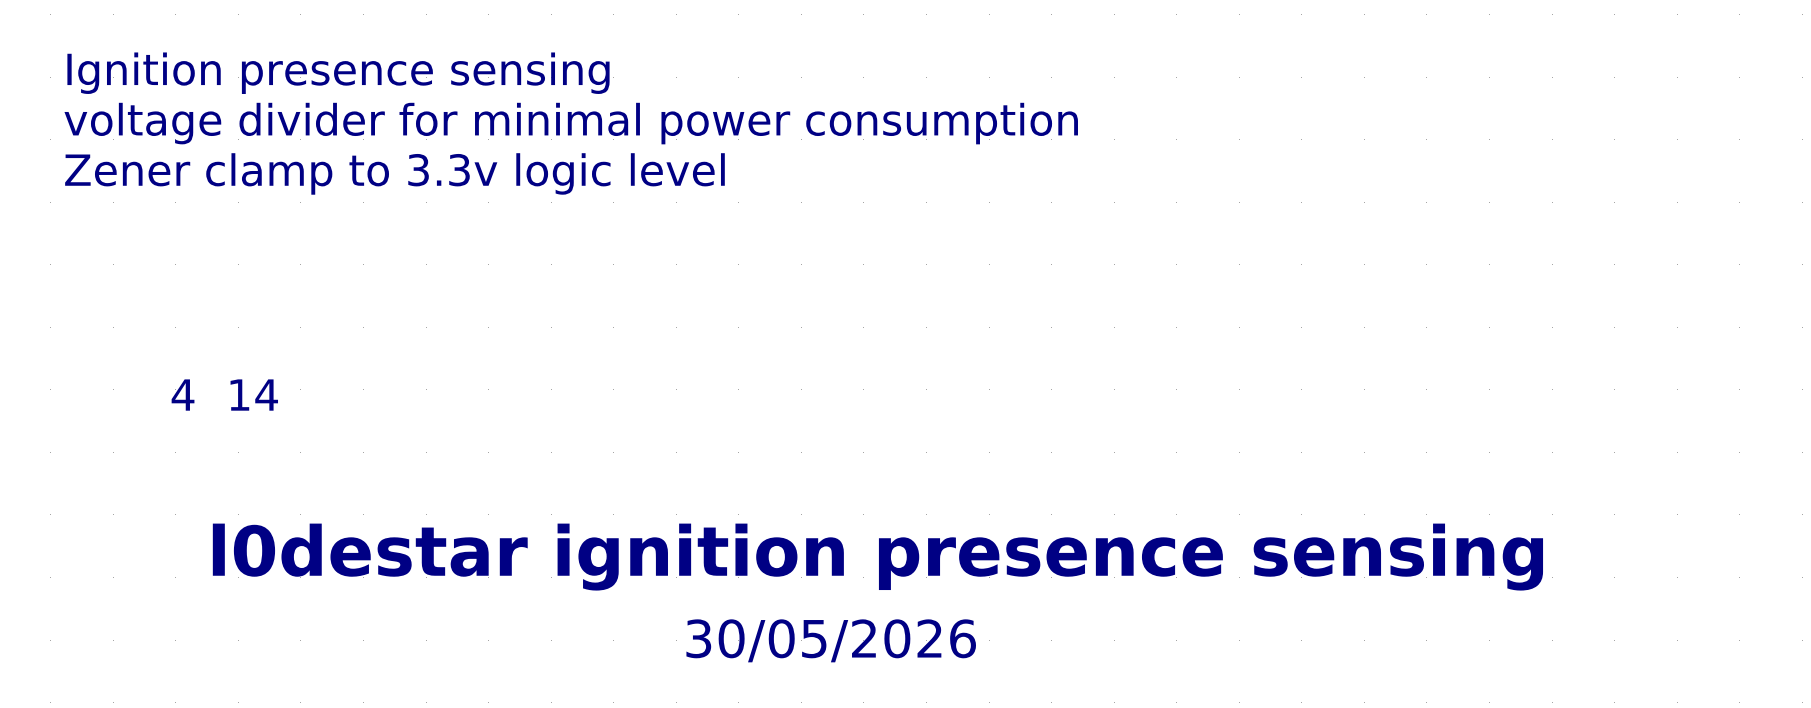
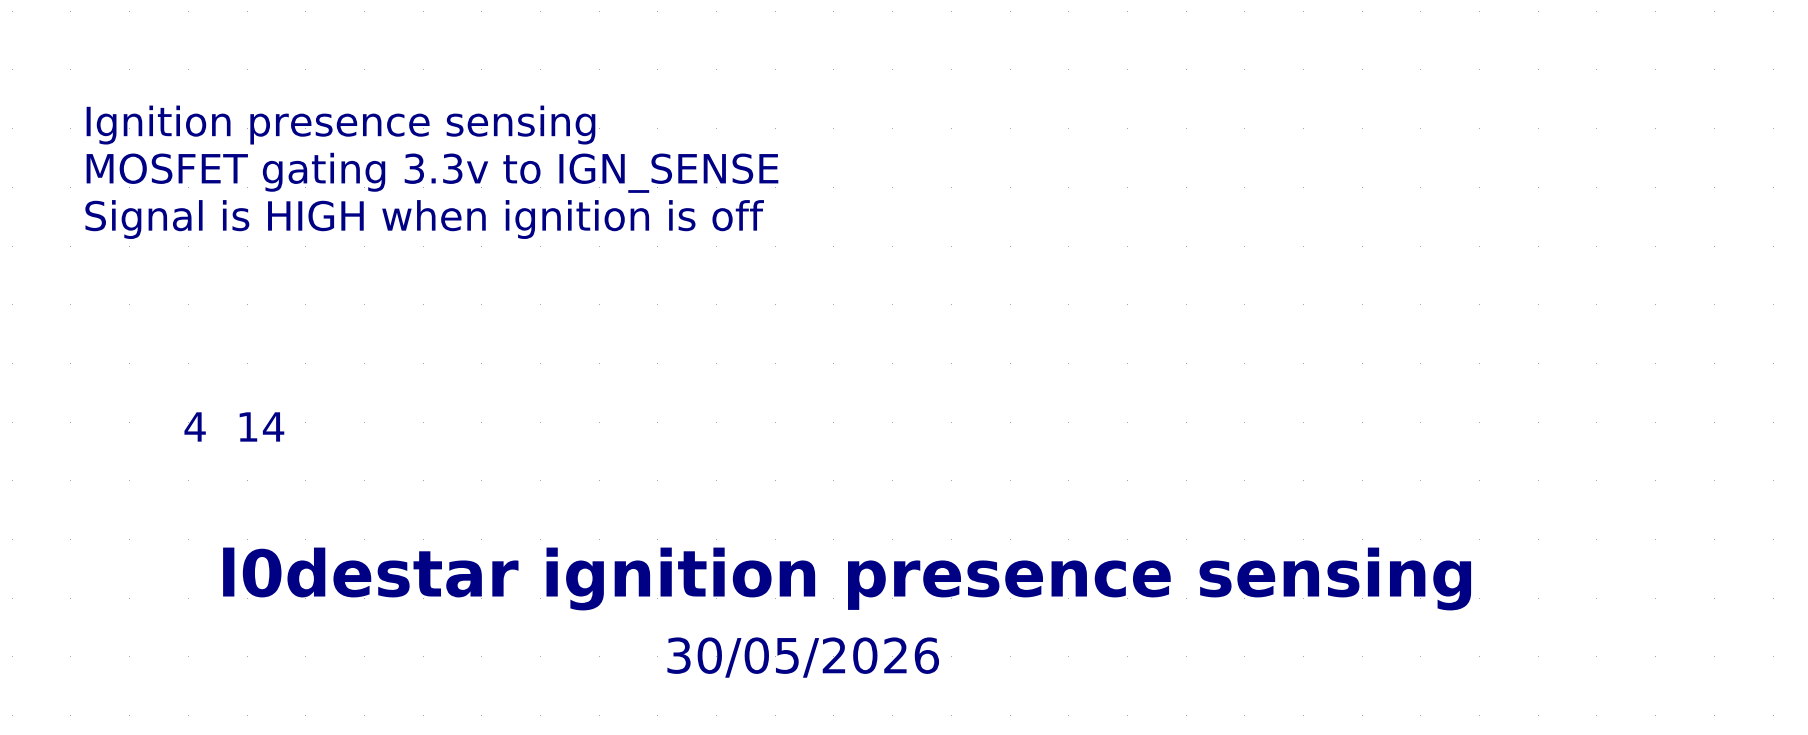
text: voltage divider for minimal power consumption (571, 123) -> MOSFET gating 3.3v to IGN_SENSE (432, 172)
text: Zener clamp to 3.3v logic level (394, 173) -> Signal is HIGH when ignition is off (424, 219)

